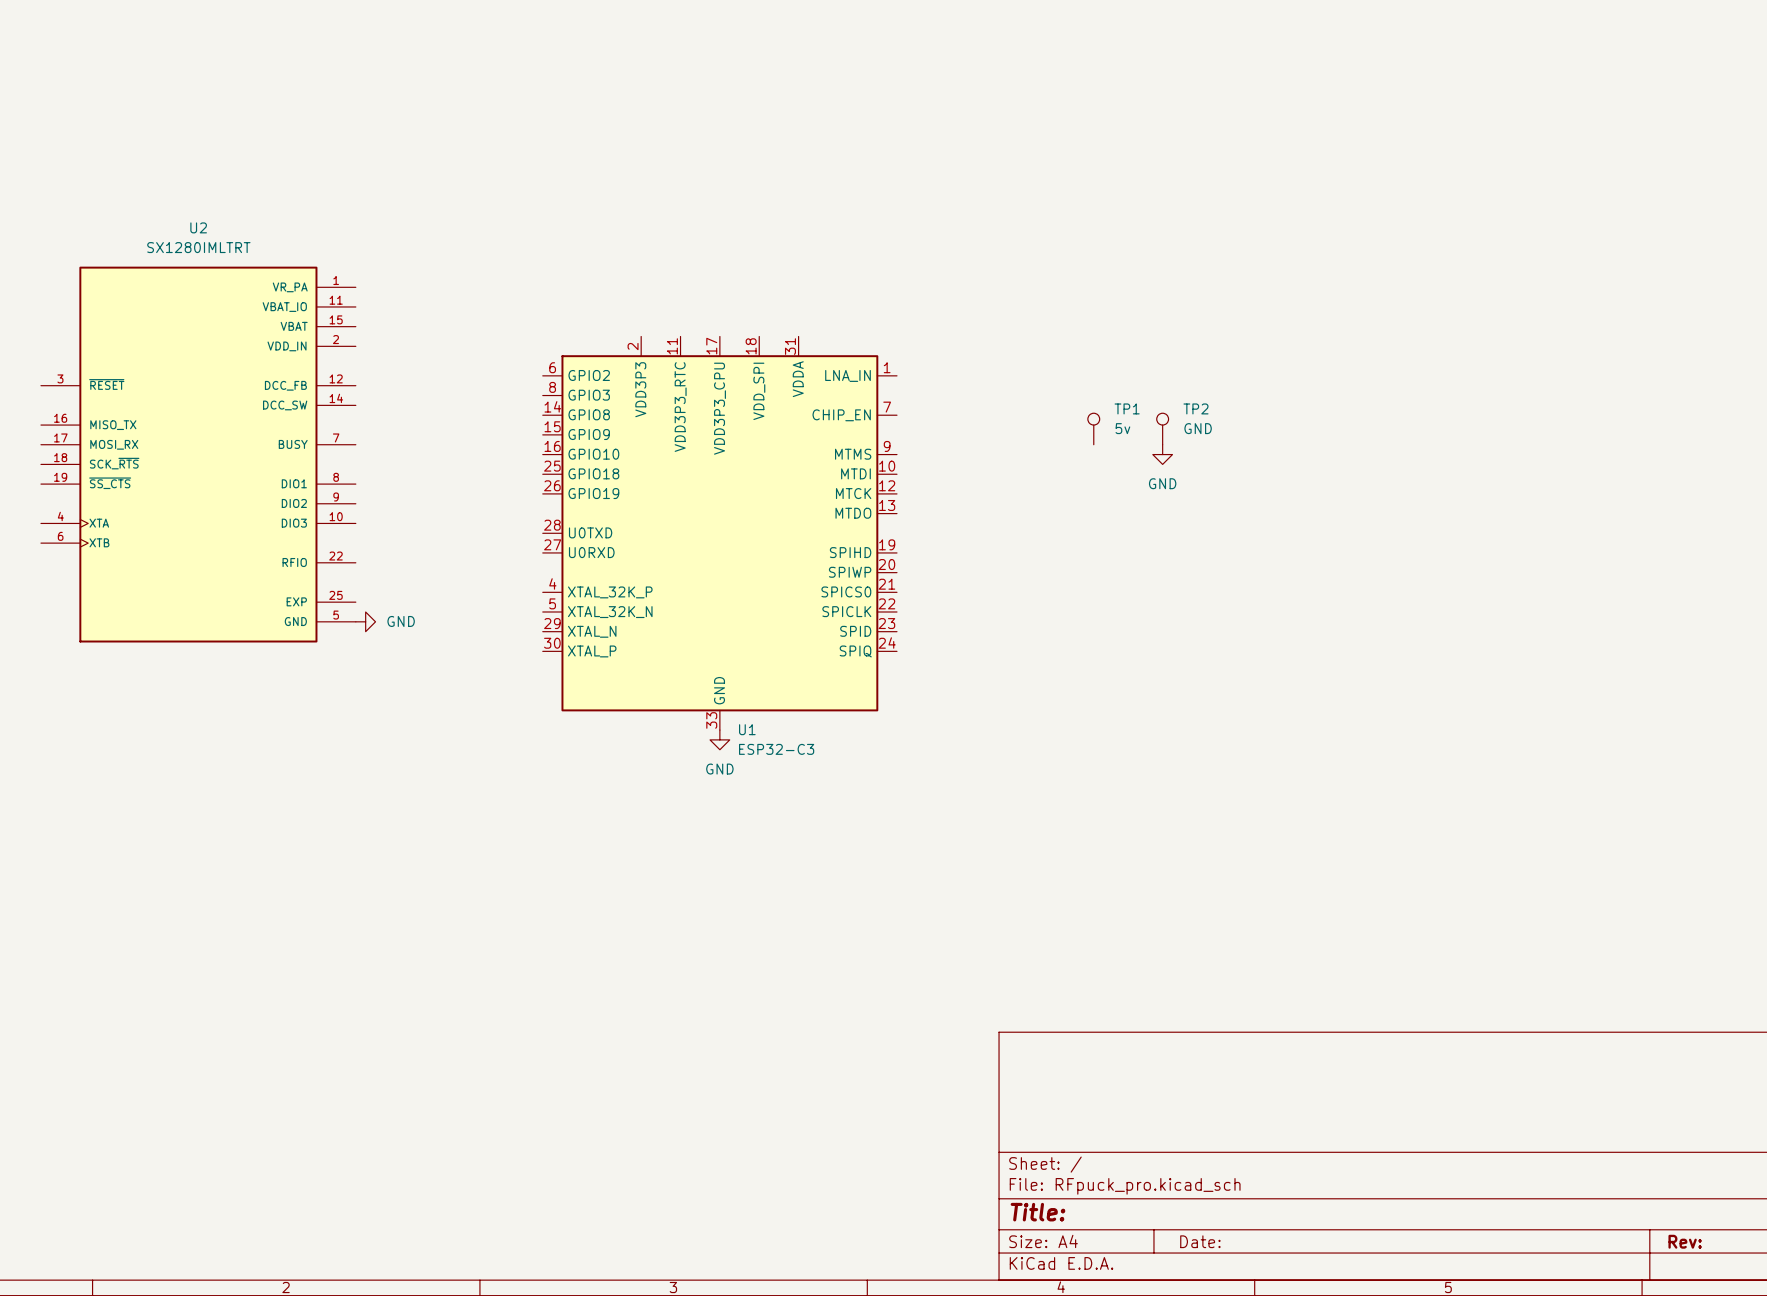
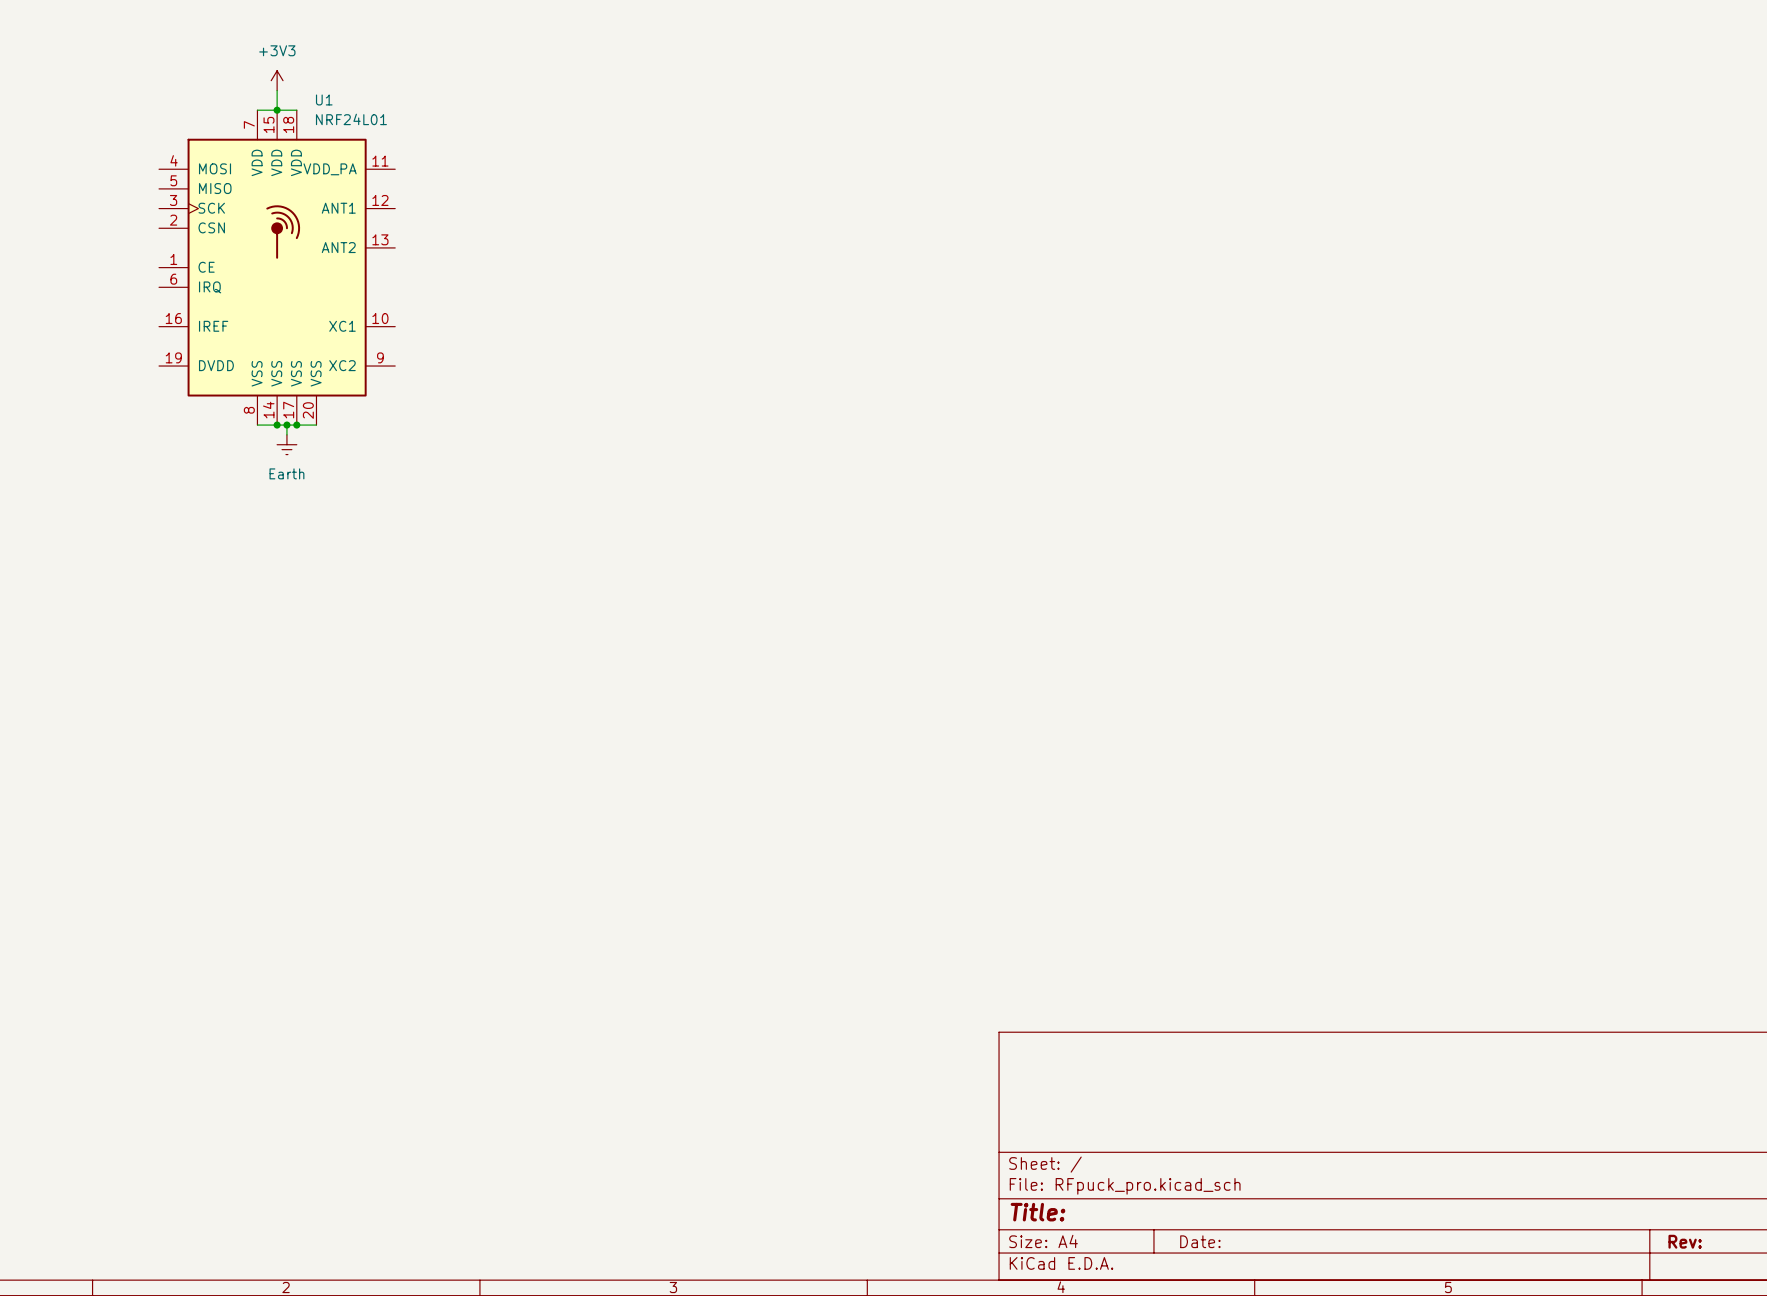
power symbol: none -> +3V3 (277, 80)
wire: none -> (277, 90) (277, 110)
wire: none -> (257, 110) (296, 110)
junction: none -> (277, 110)
U1 symbol: [542, 336, 897, 731] -> [159, 110, 396, 426]
junction: none -> (277, 425)
junction: none -> (286, 425)
junction: none -> (296, 425)
TP1: 5v (1093, 428) -> none
TP2: GND (1162, 428) -> none
power symbol: none -> Earth (286, 444)
U2: SX1280IMLTRT (198, 454) -> none
power symbol: GND (1162, 454) -> none
power symbol: GND (365, 621) -> none
U1 name position: U1 (747, 729) -> U1 (324, 99)
power symbol: GND (719, 739) -> none
U1 value: ESP32-C3 (776, 749) -> NRF24L01 (351, 119)

